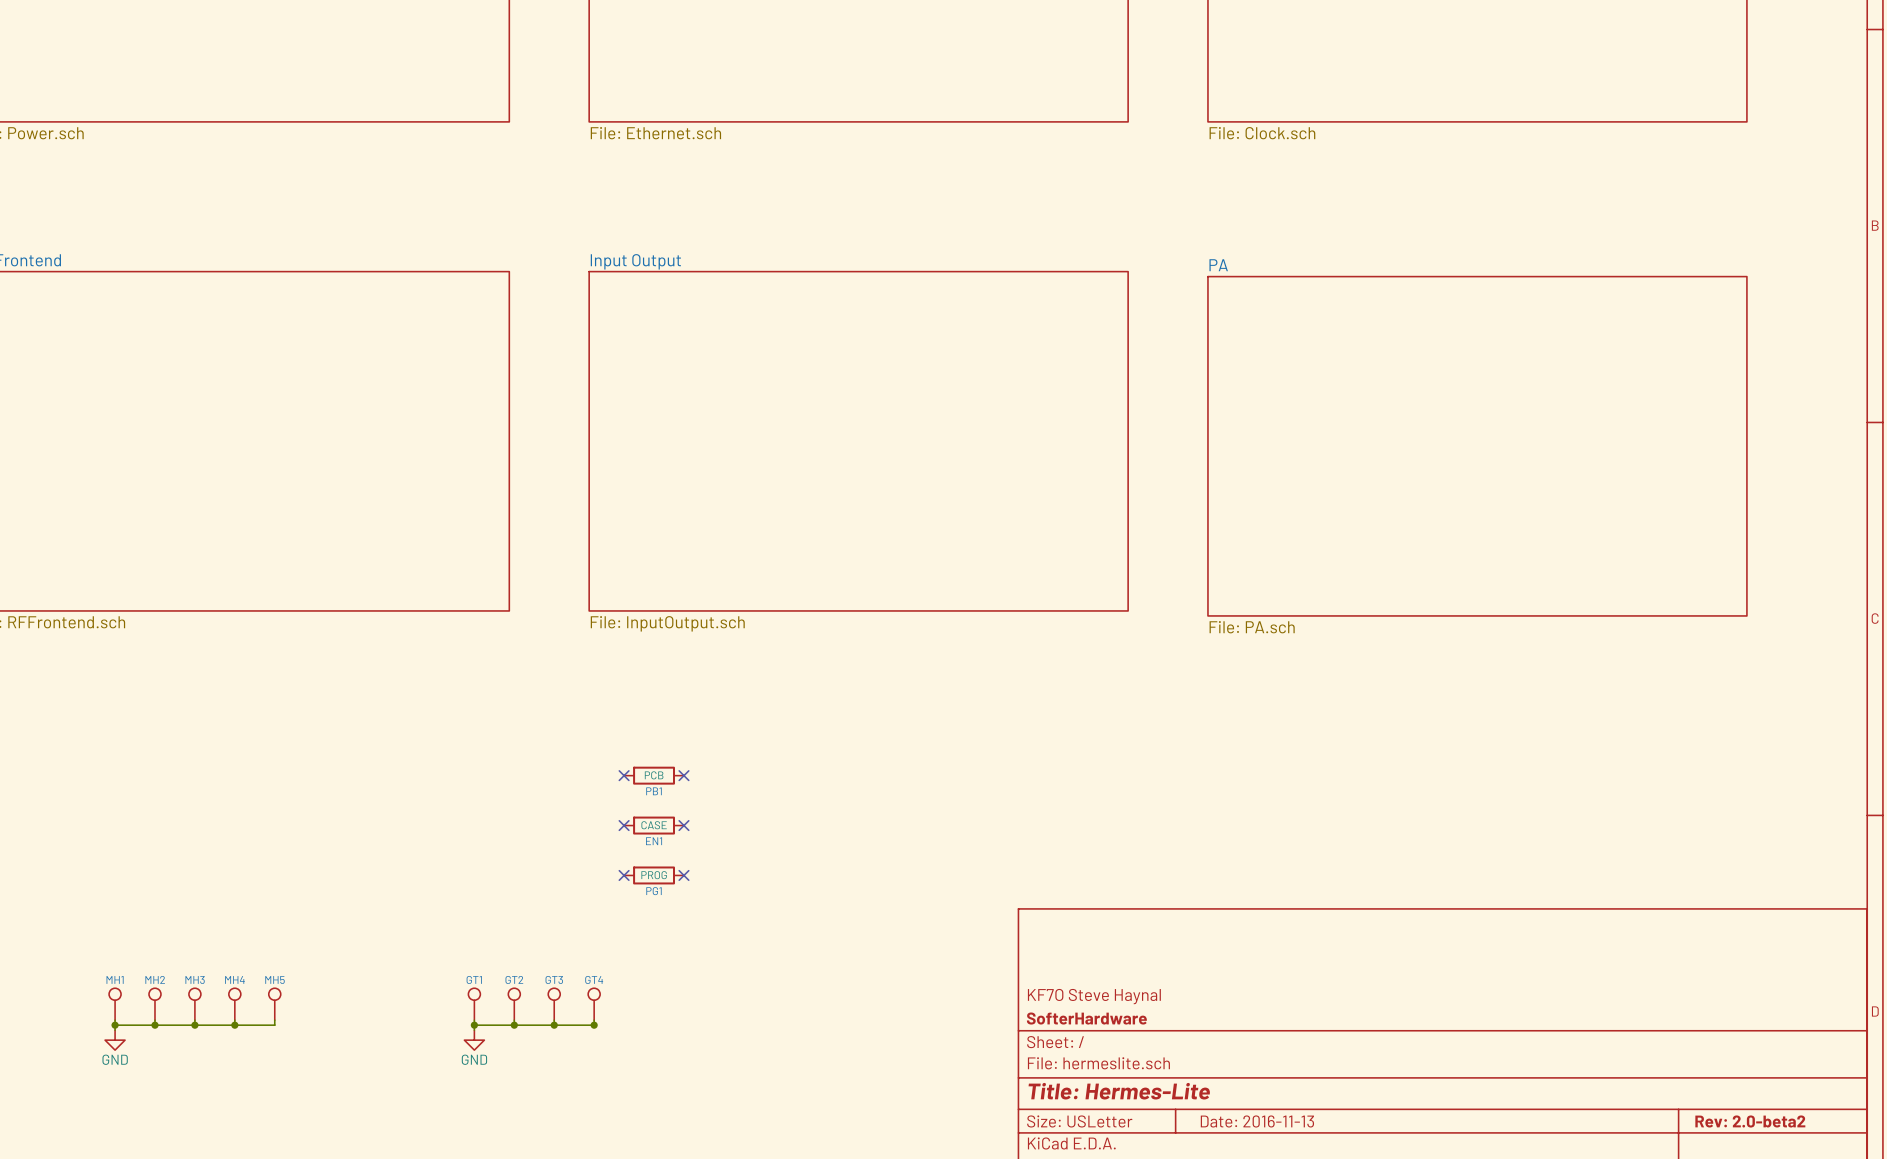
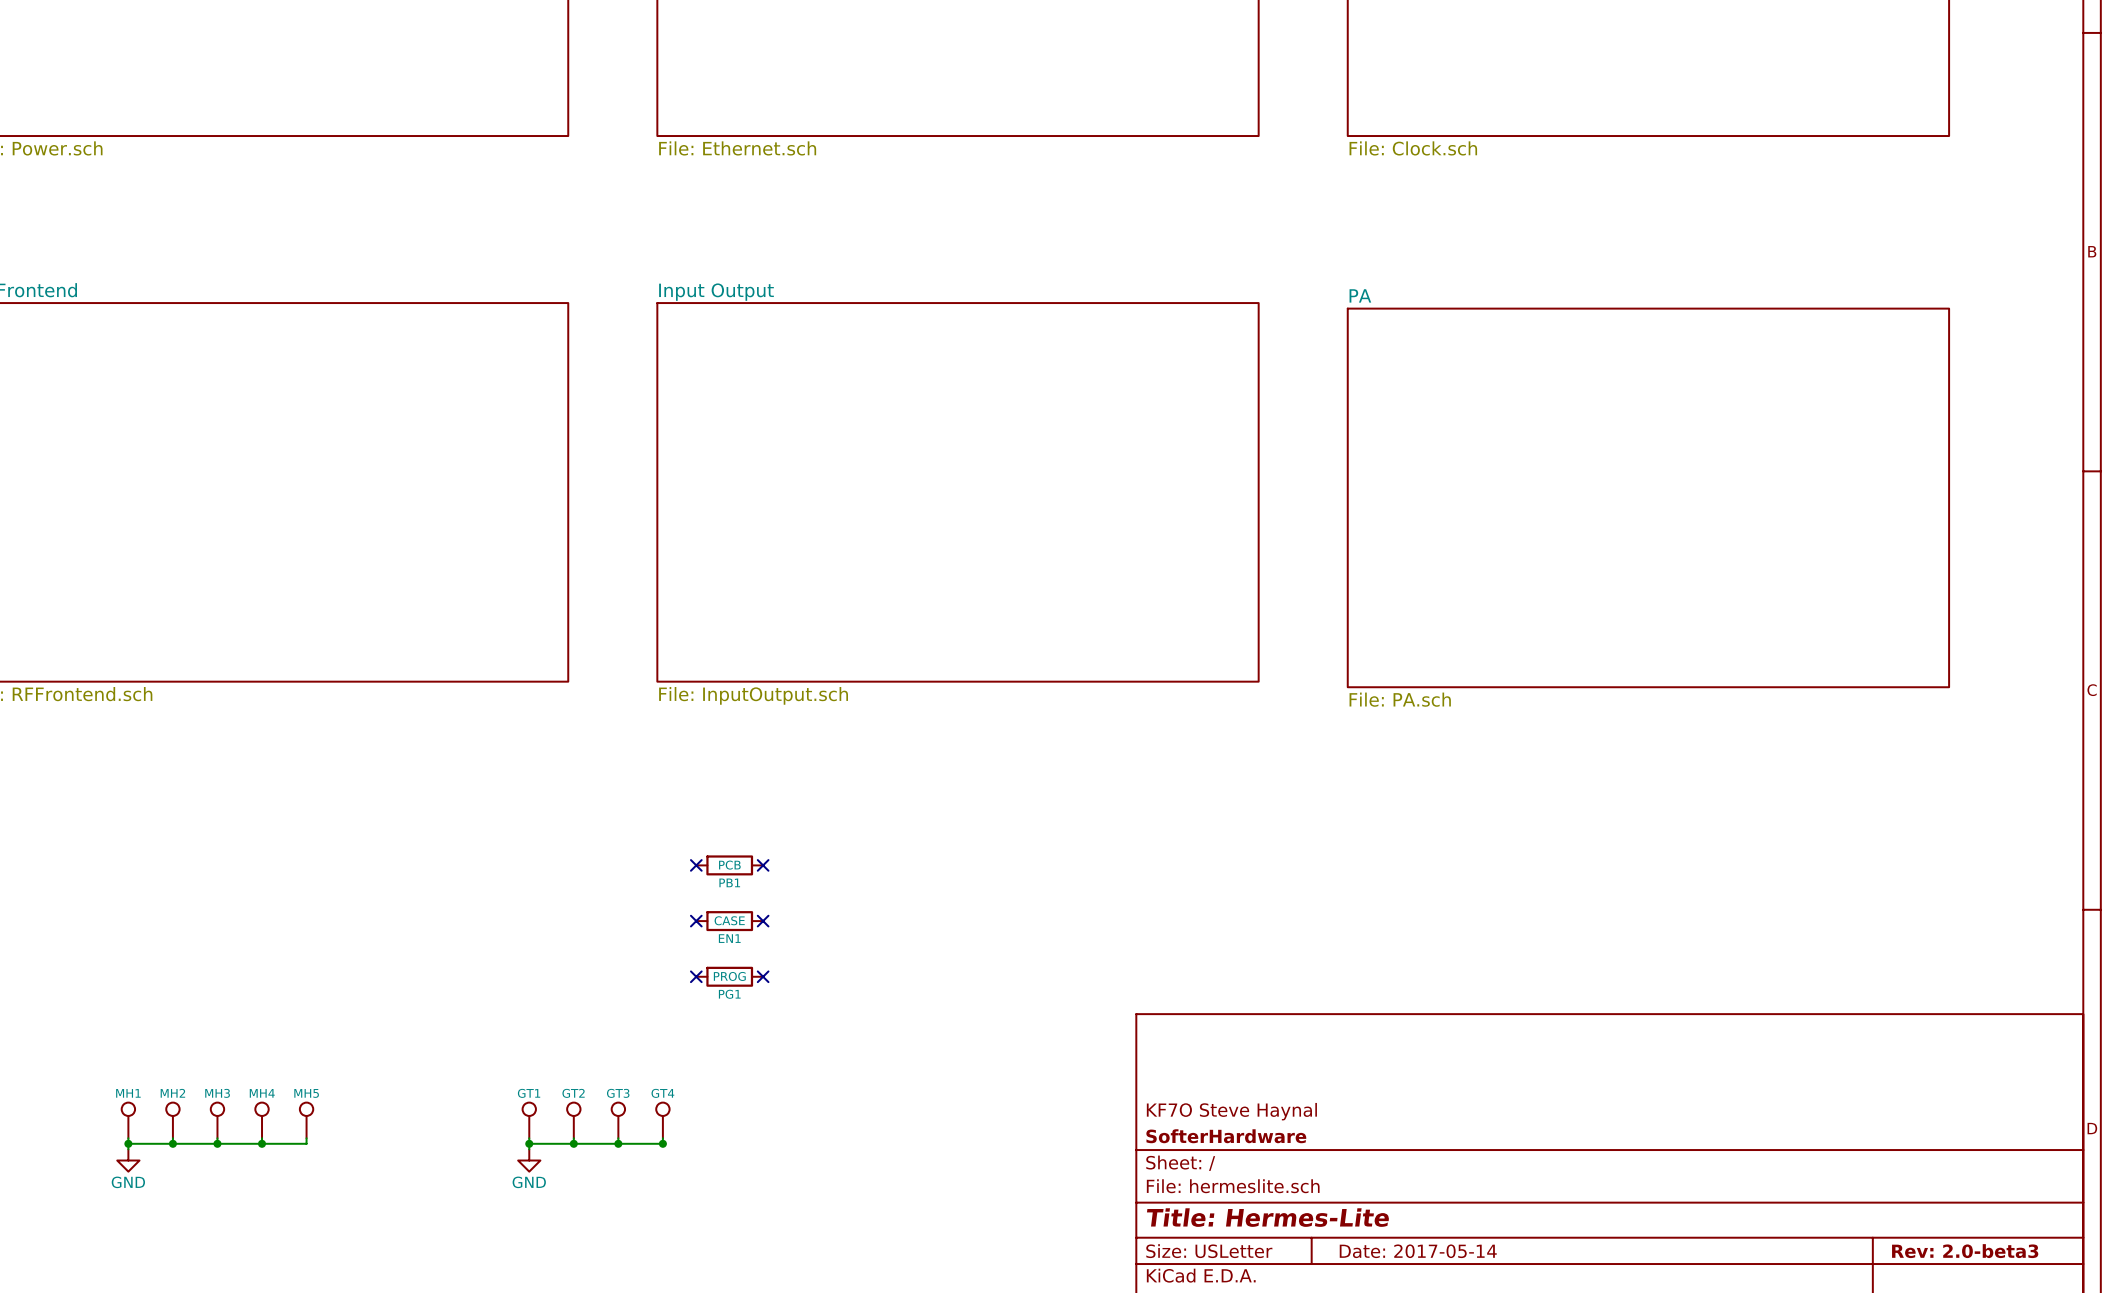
title block: Date: 2016-11-13 (1257, 1121) -> Date: 2017-05-14 (1418, 1251)
title block: Rev: 2.0-beta2 (1750, 1121) -> Rev: 2.0-beta3 (1965, 1251)

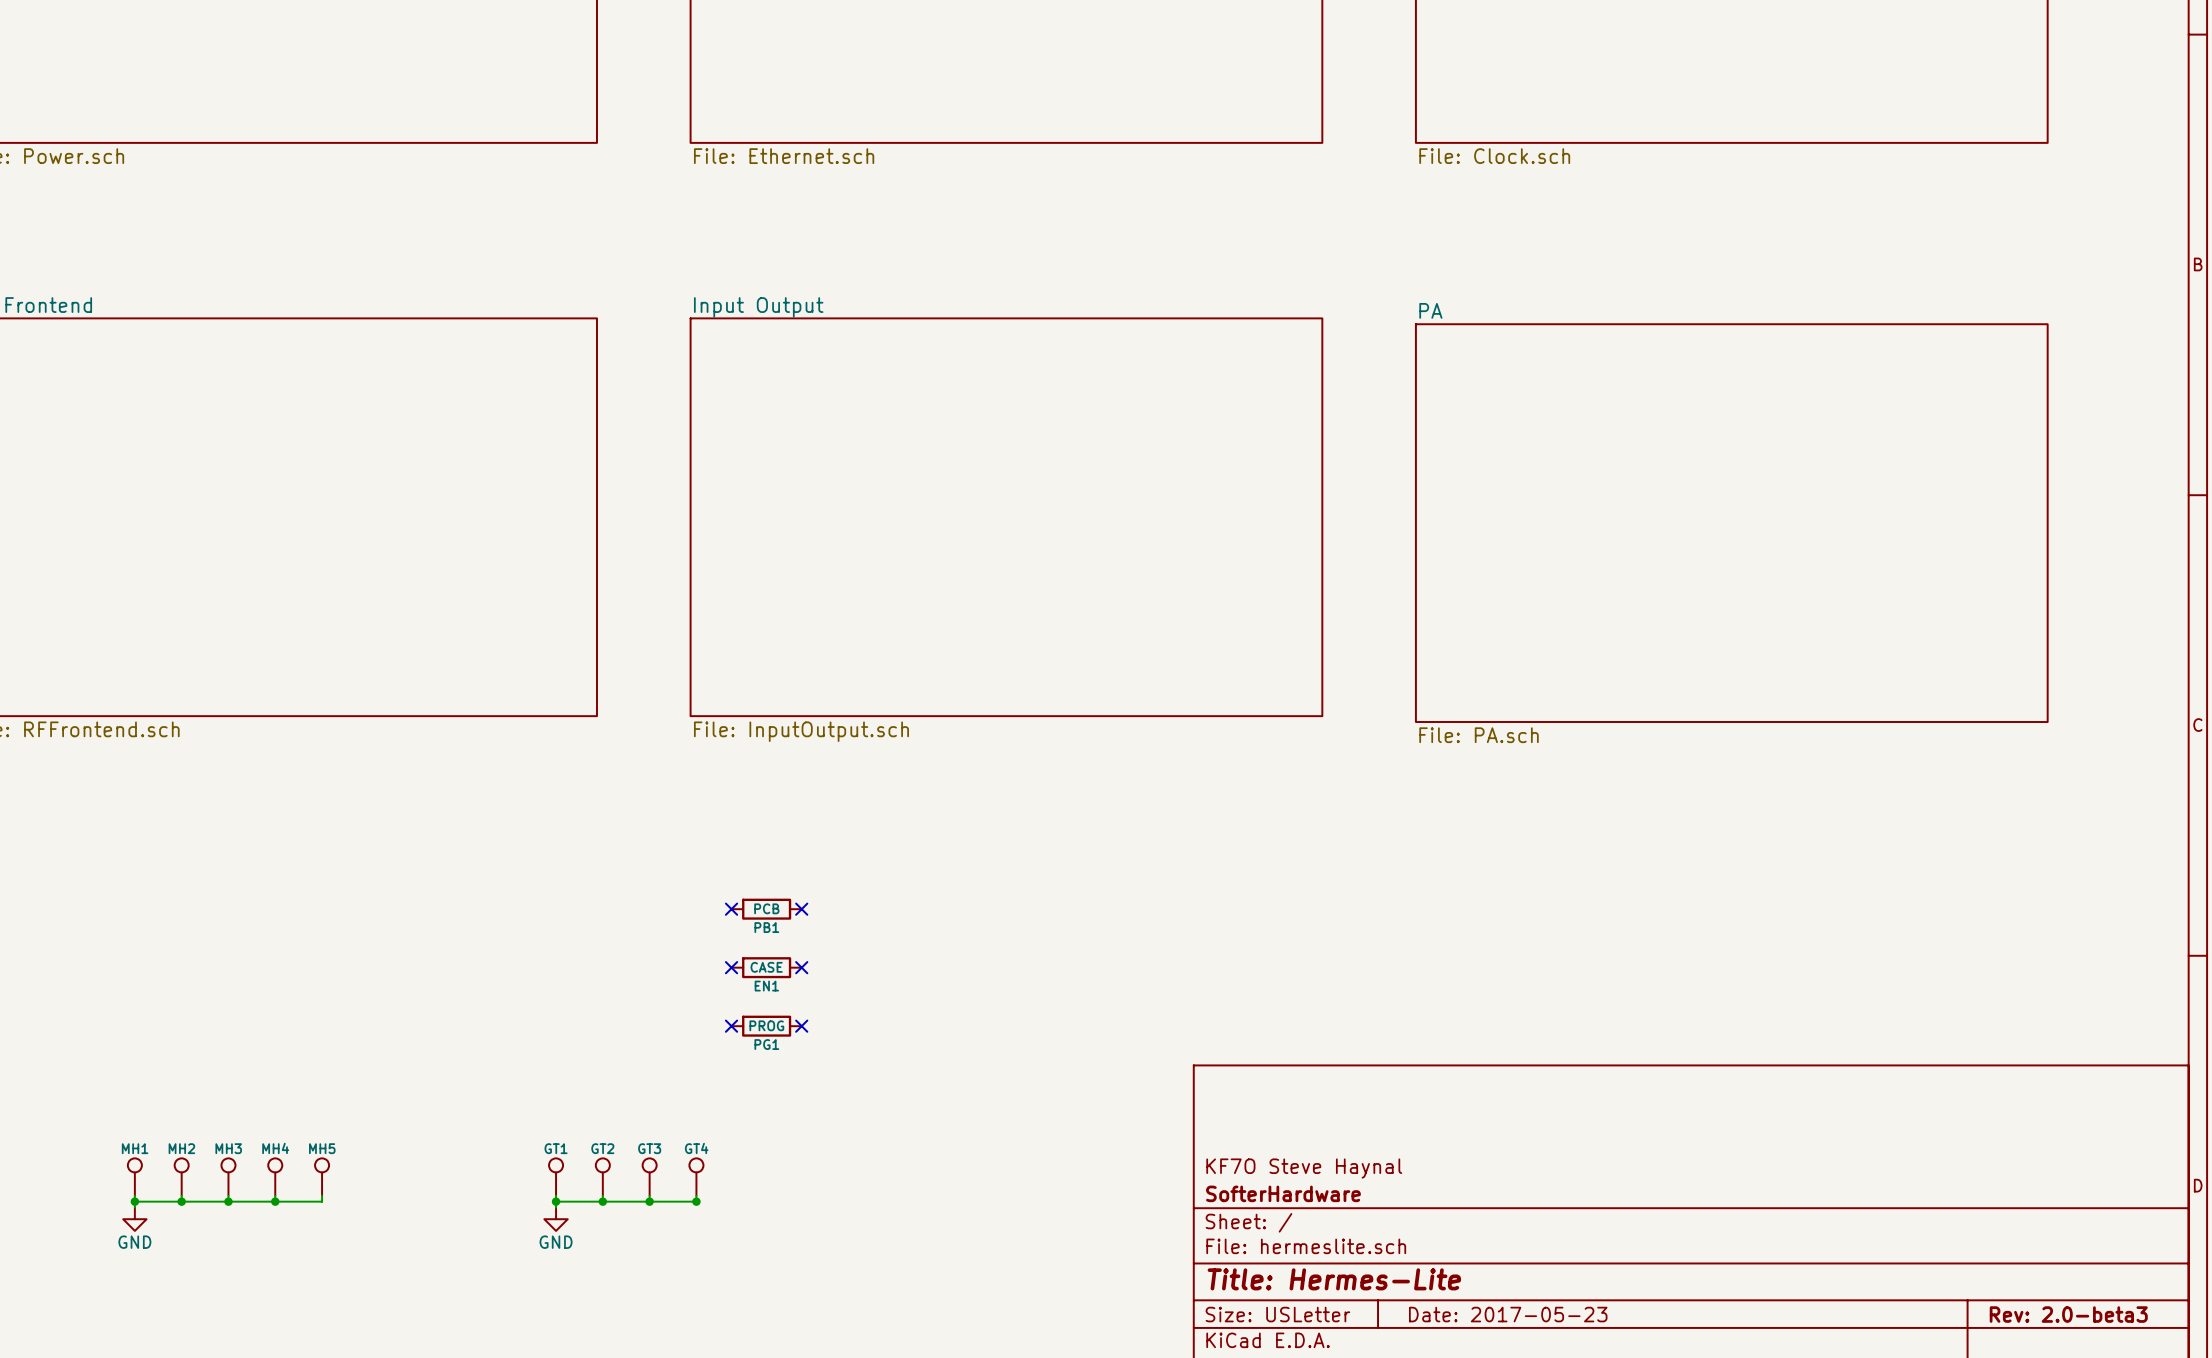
title block: Date: 2017-05-14 (1418, 1251) -> Date: 2017-05-23 (1508, 1314)

